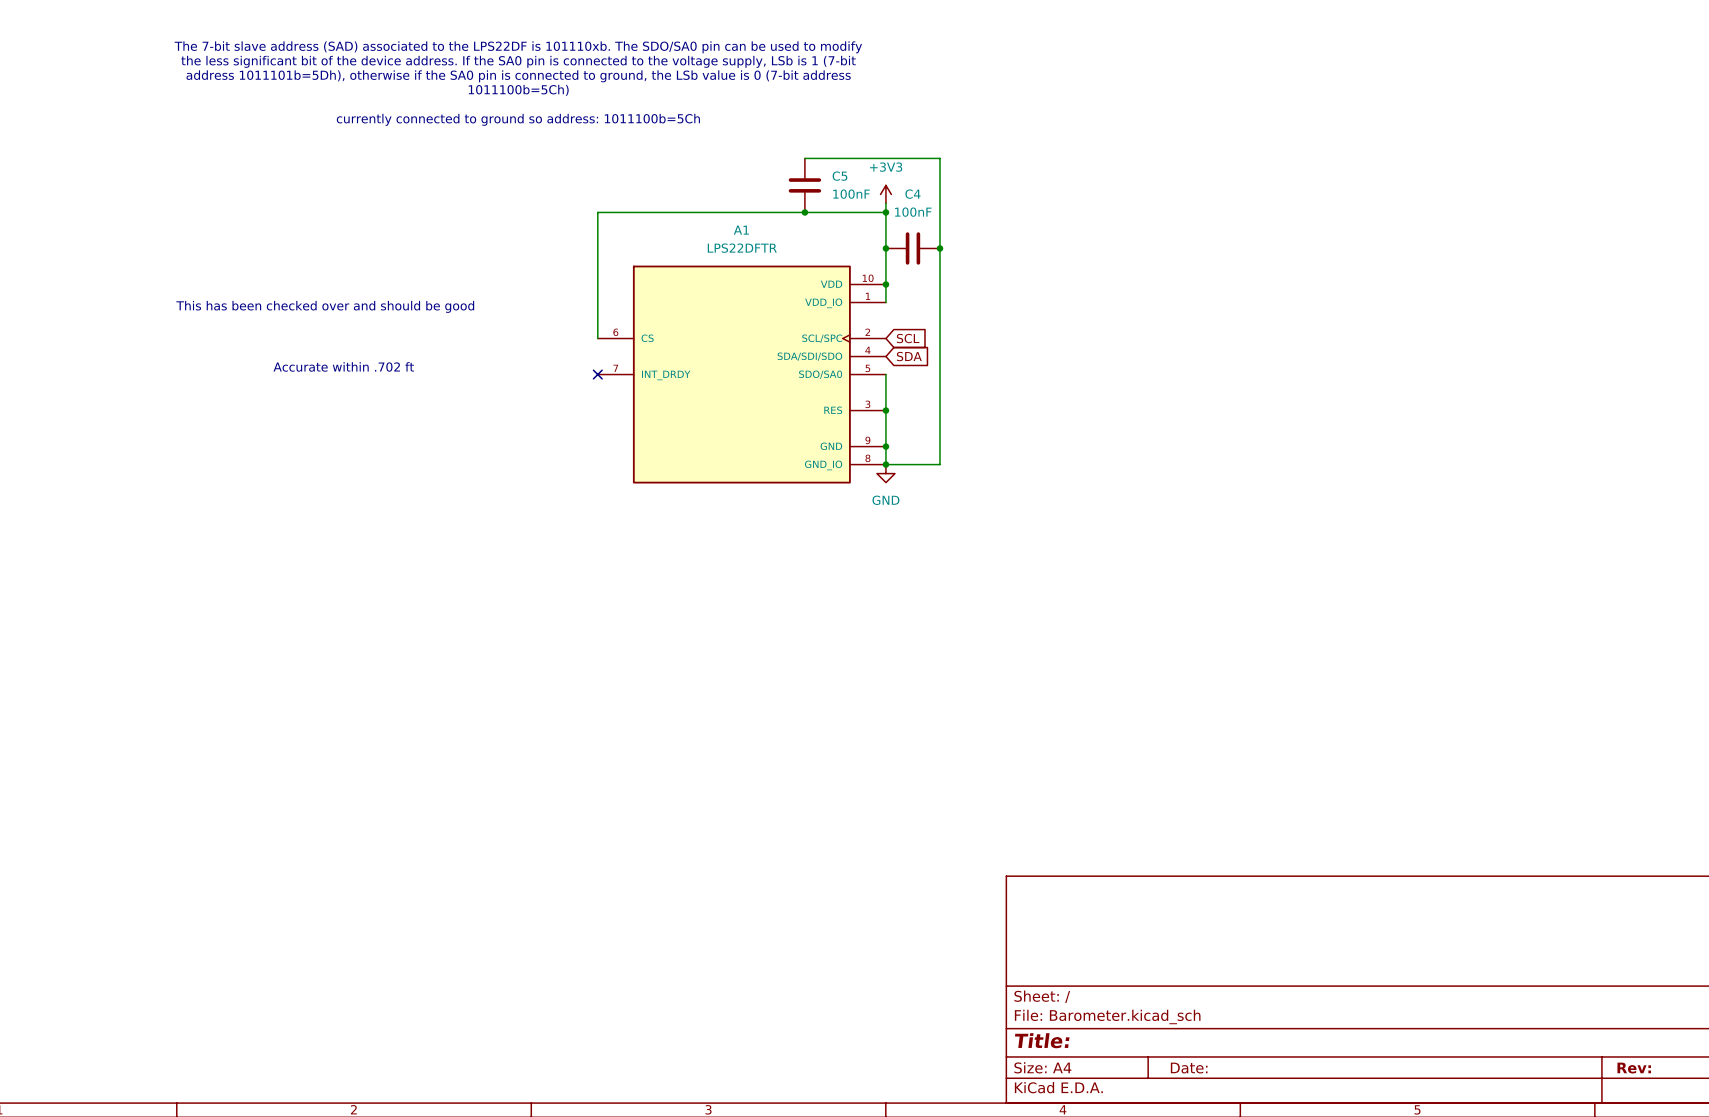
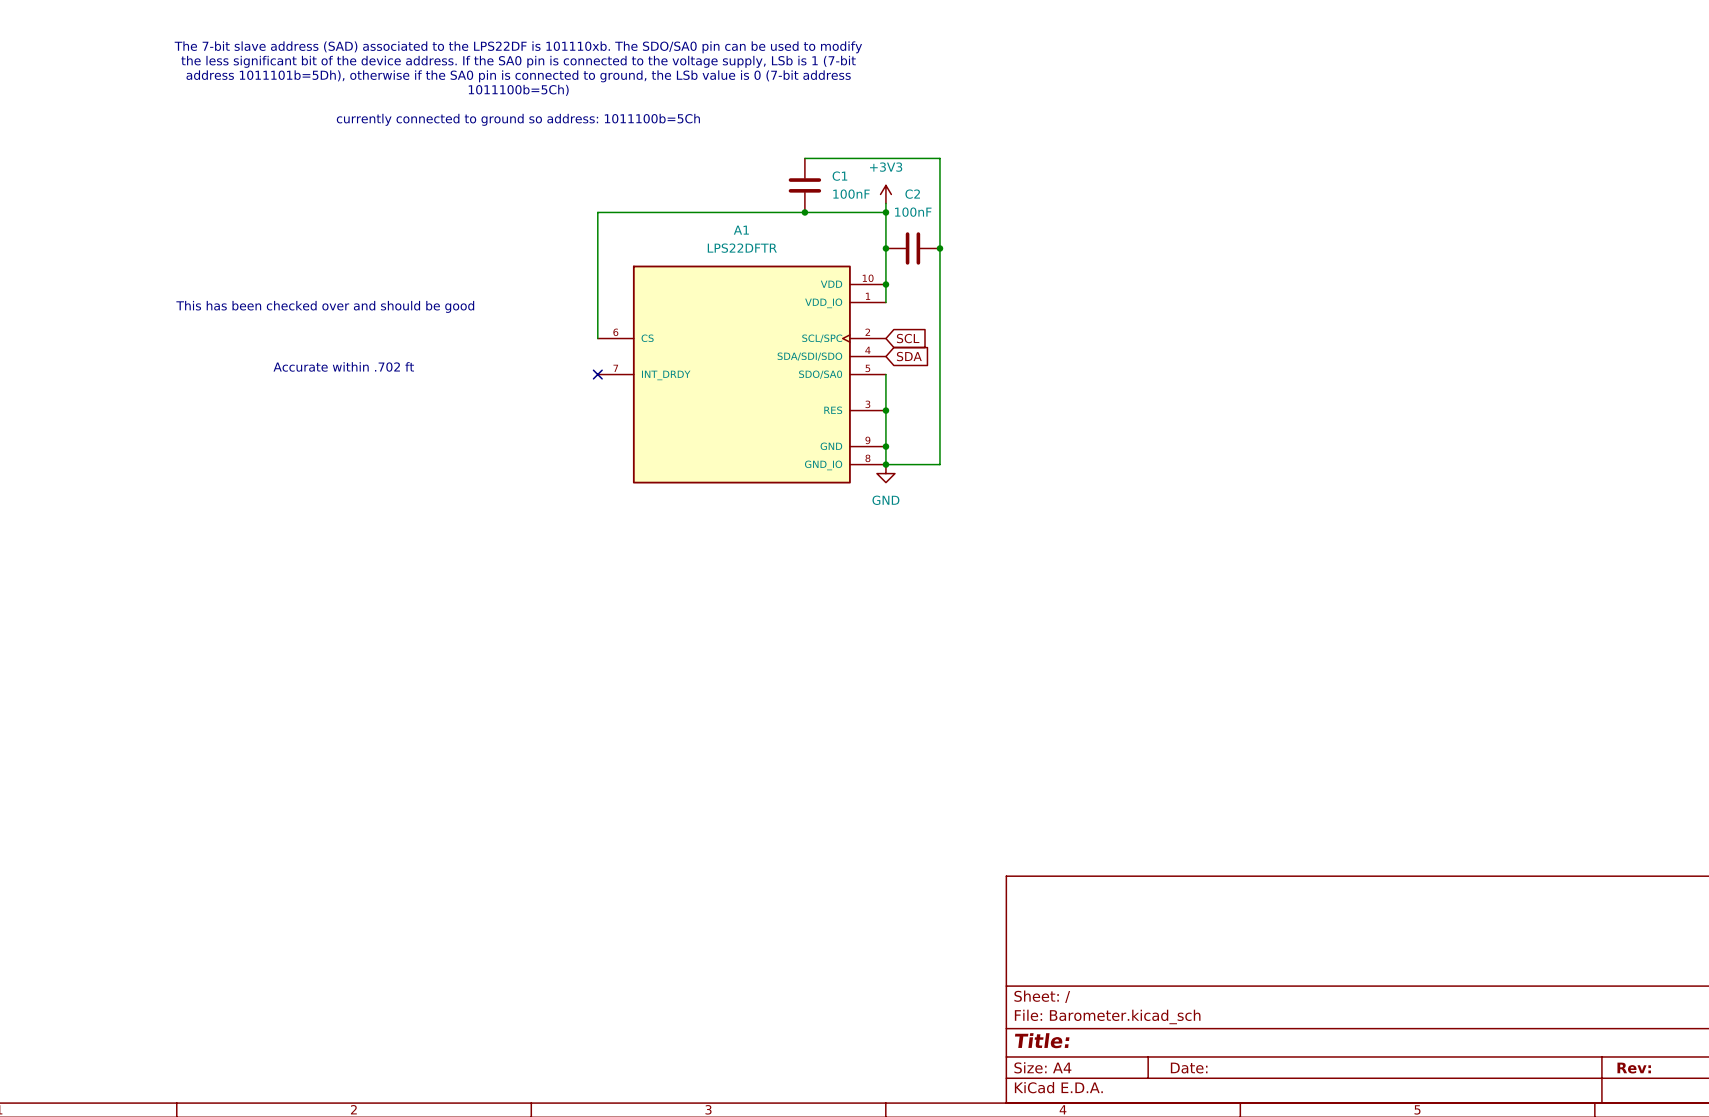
C5 name: C5 (839, 176) -> C1 (839, 176)
C4 name: C4 (912, 194) -> C2 (912, 194)

